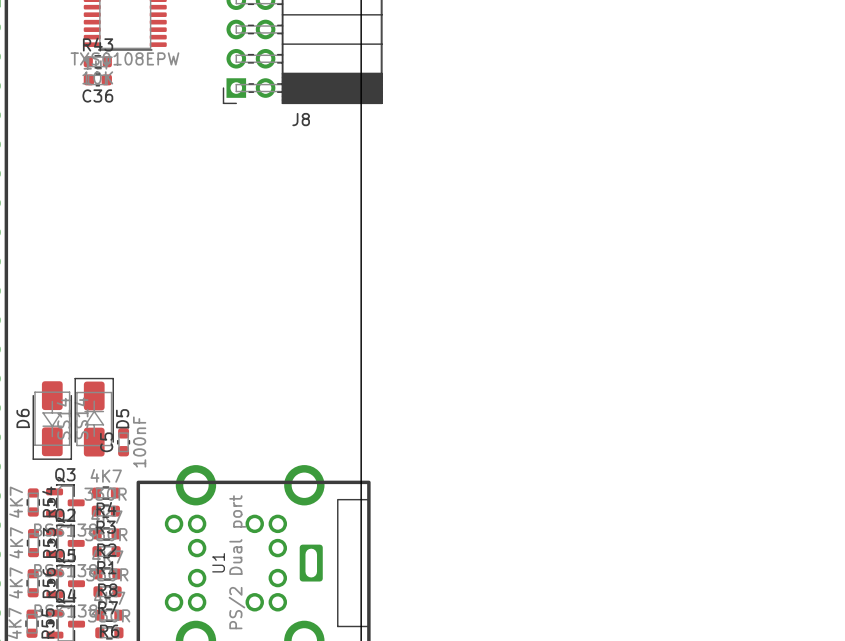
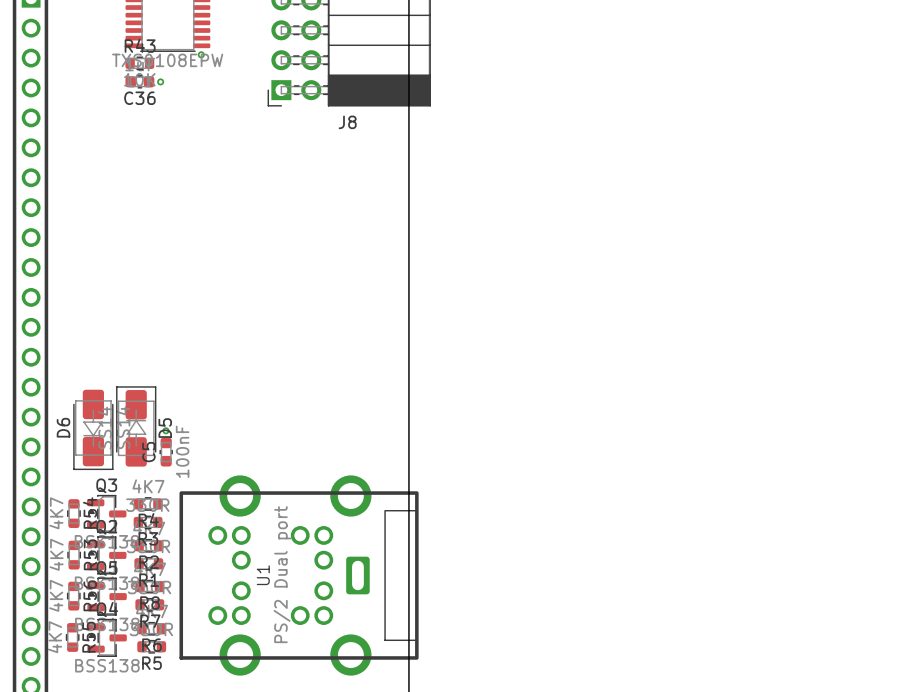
via: none -> (201, 54)
via: none -> (160, 81)
via: none -> (165, 430)

